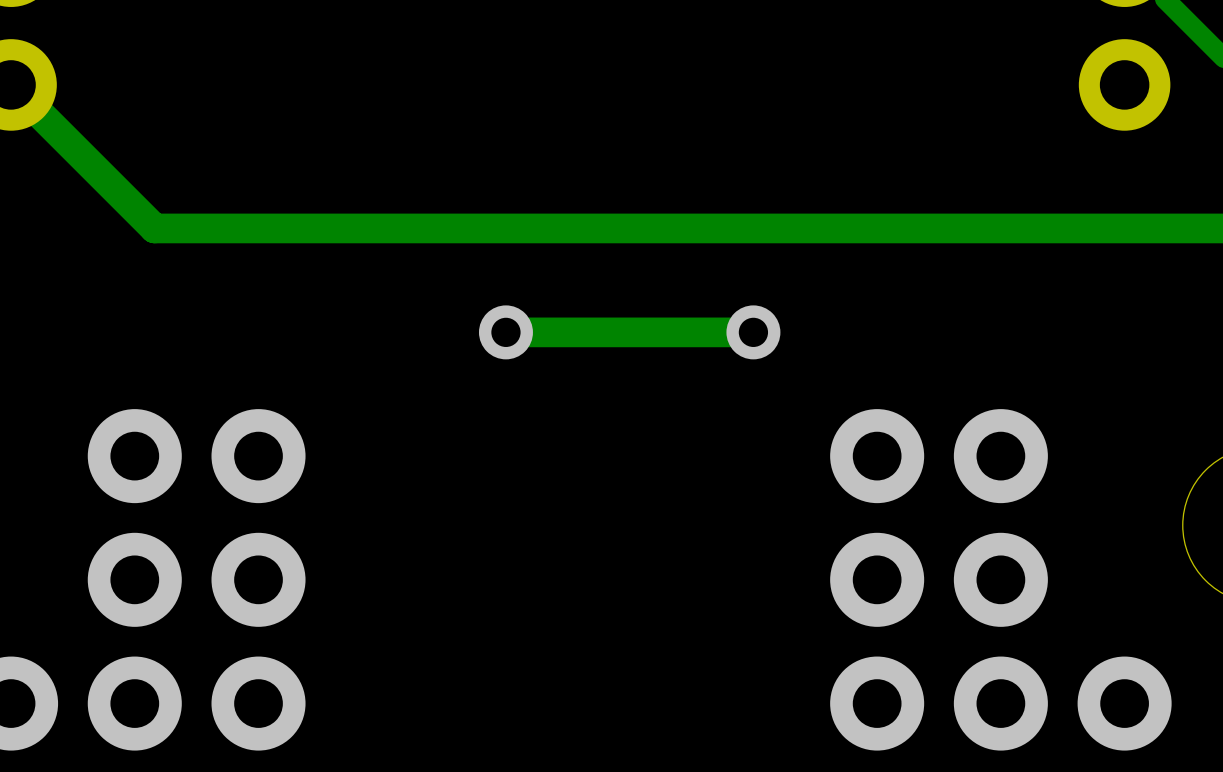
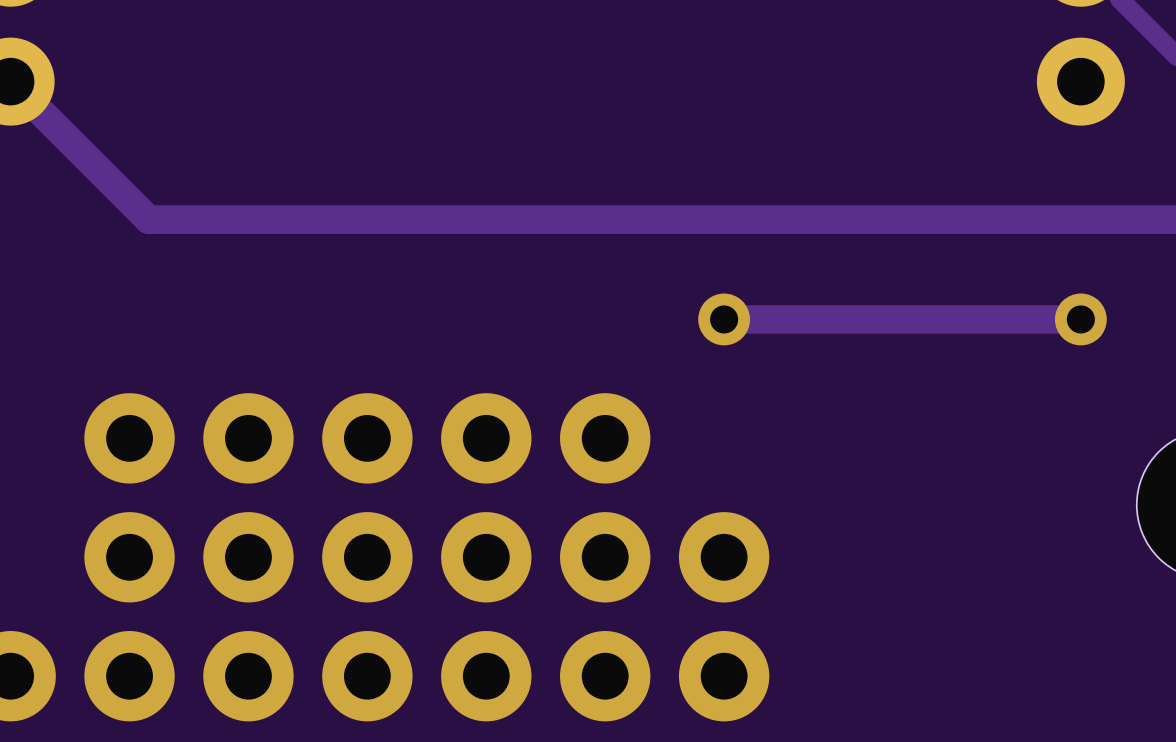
via: (505, 332) -> none
track: (753, 332) (505, 332) -> (724, 319) (1080, 319)
via: none -> (1080, 319)
via: none -> (367, 438)
via: none -> (486, 438)
via: none -> (605, 438)
via: (877, 456) -> none
via: (1000, 456) -> none
via: none -> (367, 557)
via: none -> (486, 557)
via: none -> (605, 557)
via: none -> (724, 557)
via: (877, 579) -> none
via: (1000, 579) -> none
via: none -> (367, 676)
via: none -> (486, 676)
via: none -> (605, 676)
via: none -> (724, 676)
via: (877, 703) -> none
via: (1000, 703) -> none
via: (1124, 703) -> none

